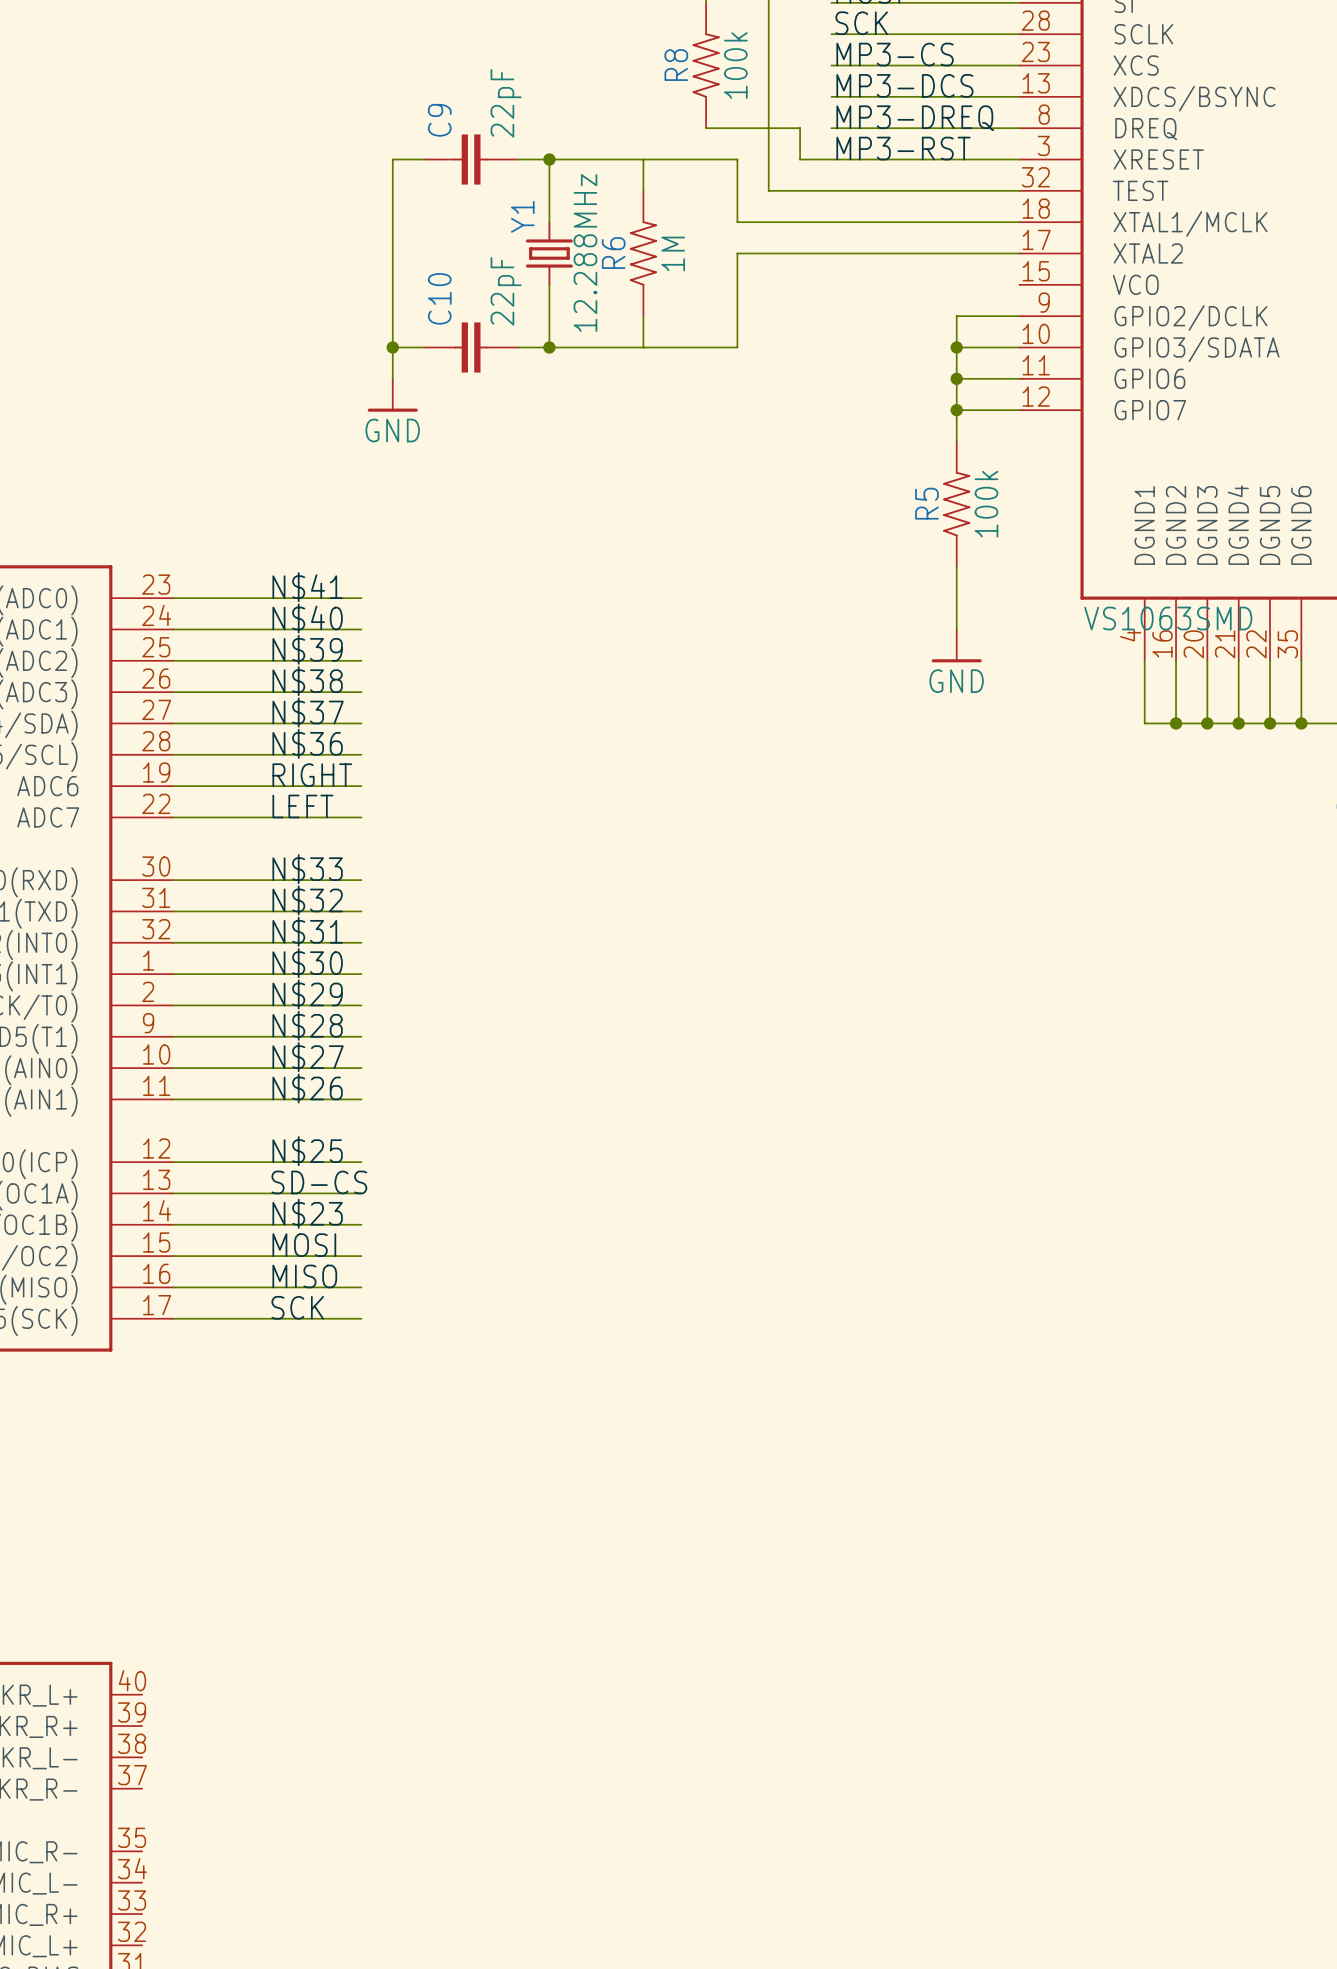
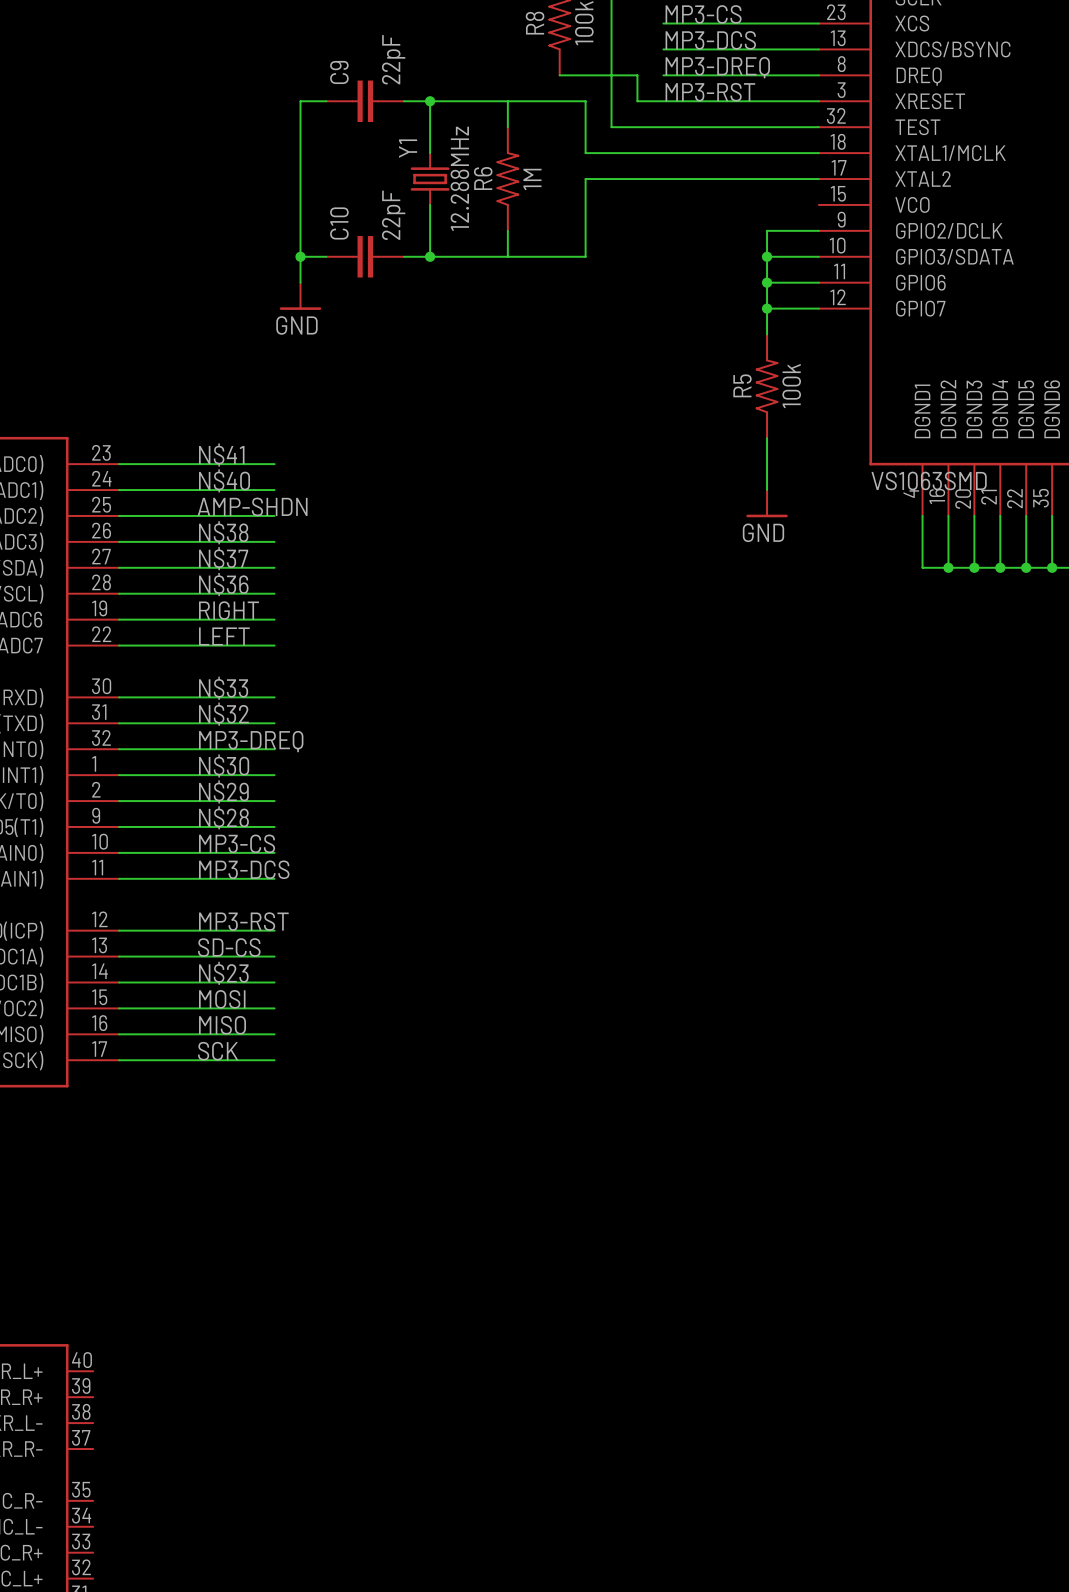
label: N$39 (307, 649) -> AMP-SHDN (252, 506)
label: N$31 (307, 931) -> MP3-DREQ (251, 741)
label: N$27 (308, 1057) -> MP3-CS (237, 843)
label: N$26 (307, 1088) -> MP3-DCS (244, 869)
label: N$25 (307, 1151) -> MP3-RST (243, 921)

